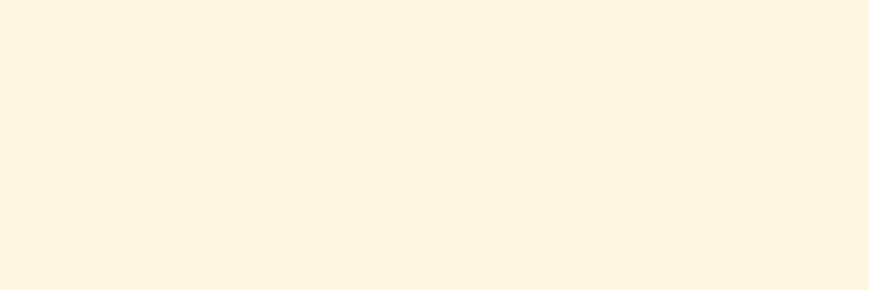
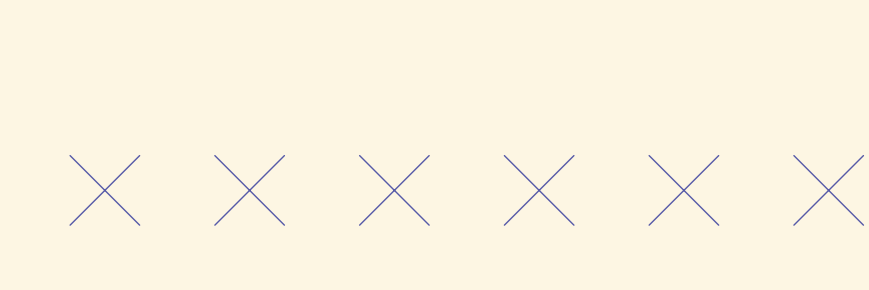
no-connect mark: none -> (104, 190)
no-connect mark: none -> (249, 190)
no-connect mark: none -> (394, 190)
no-connect mark: none -> (539, 190)
no-connect mark: none -> (683, 190)
no-connect mark: none -> (828, 190)

